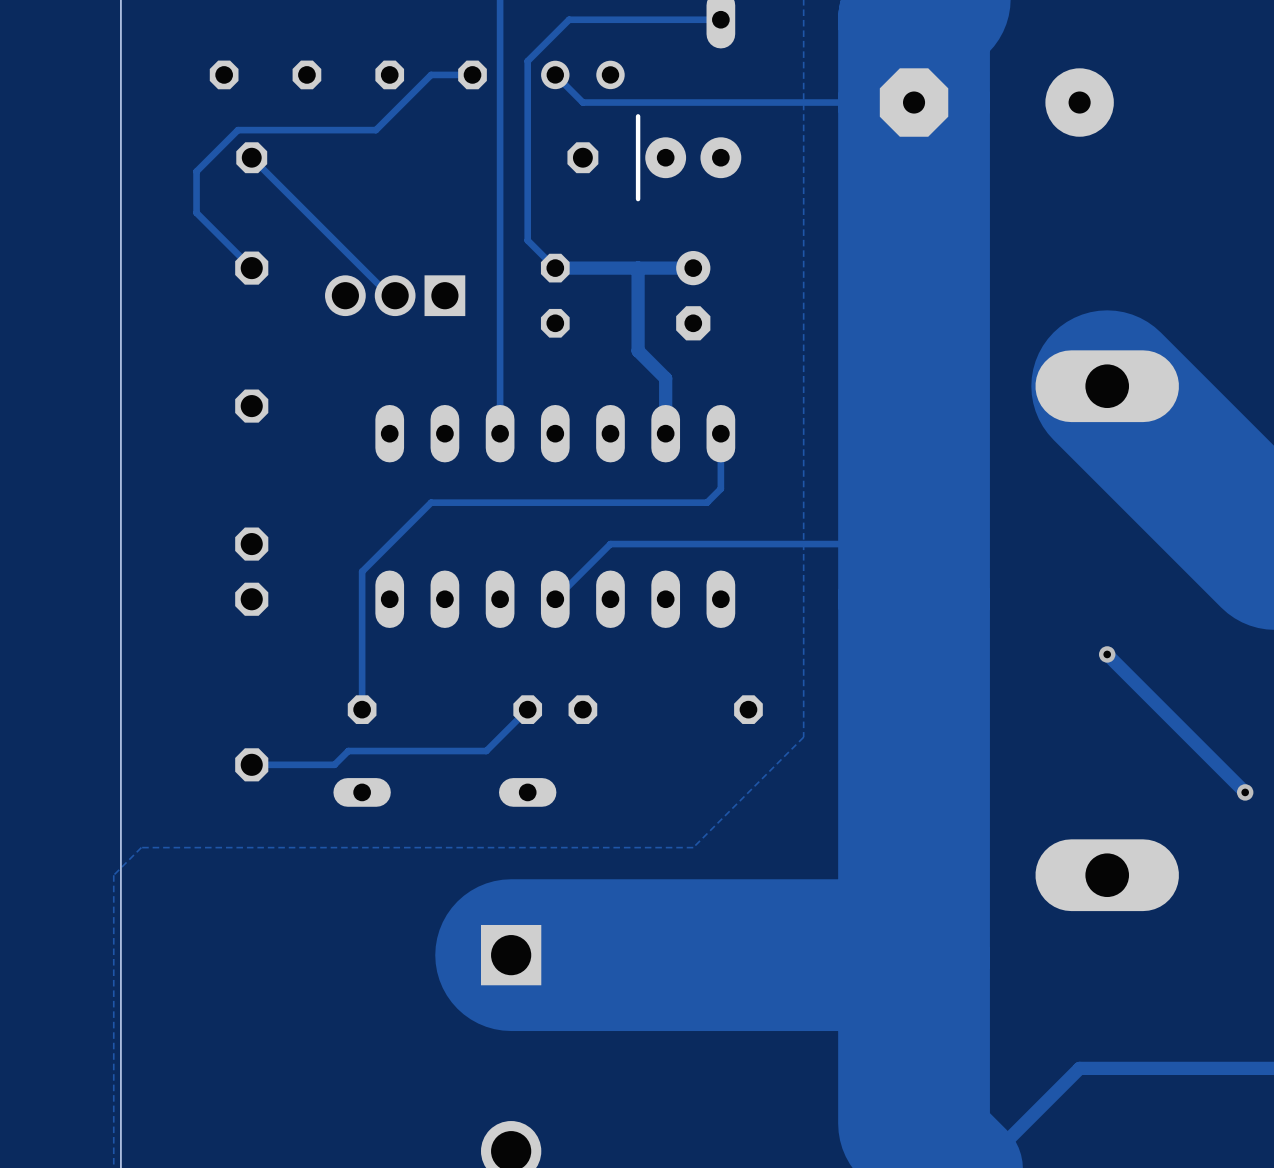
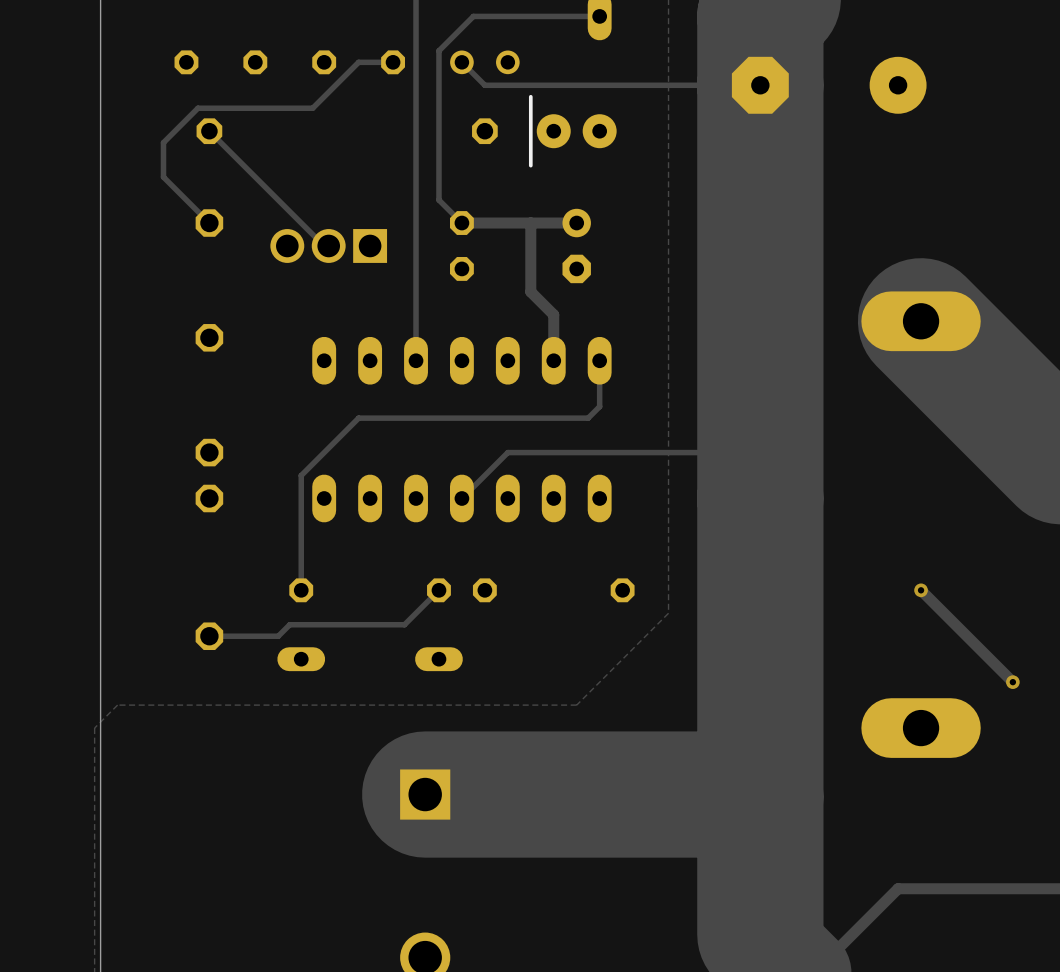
track: (1107, 654) (1245, 792) -> none
via position: (1107, 654) -> (921, 590)
track: none -> (921, 590) (1012, 682)
via position: (1245, 792) -> (1012, 682)

